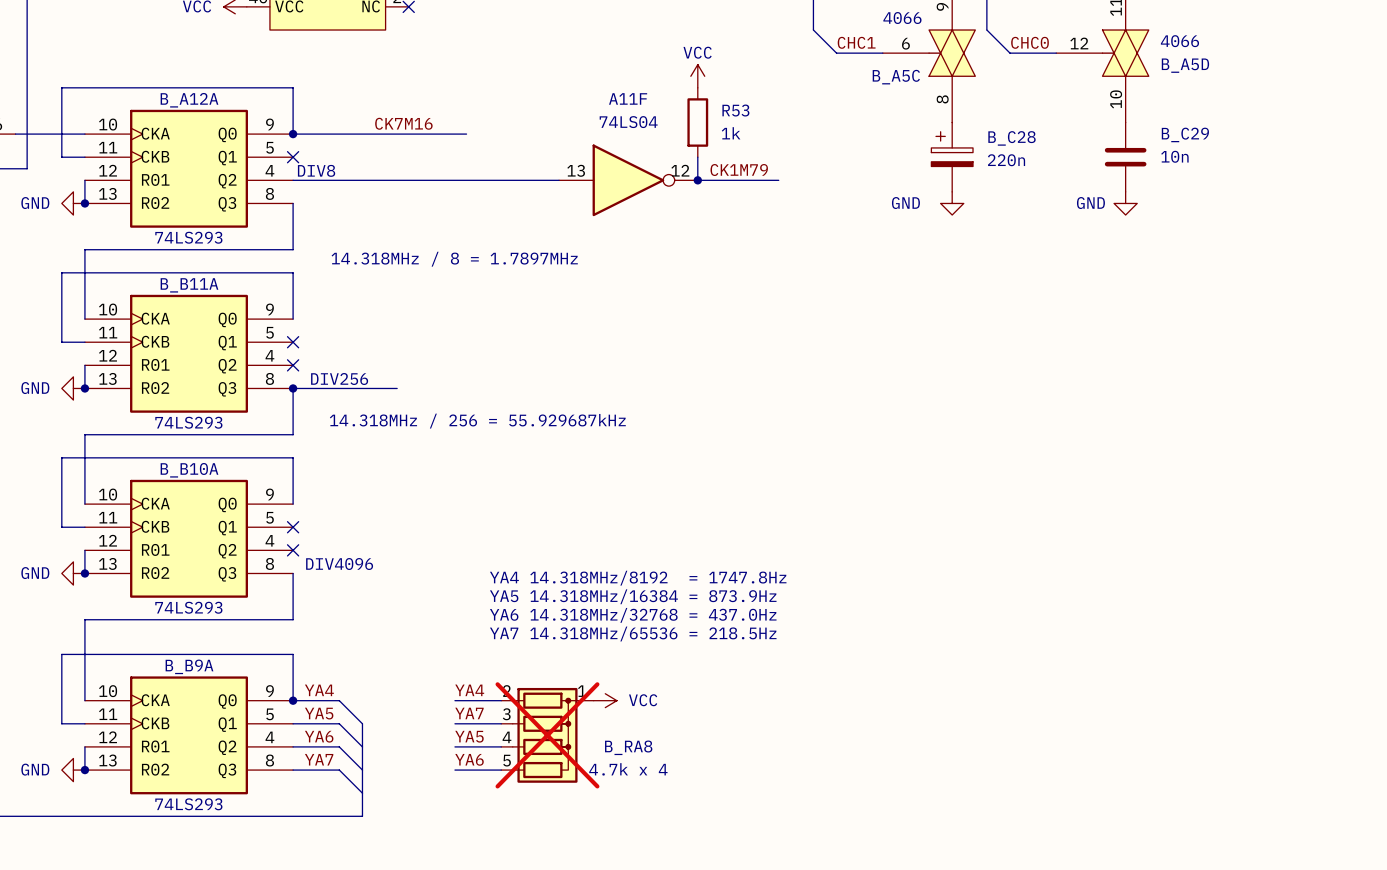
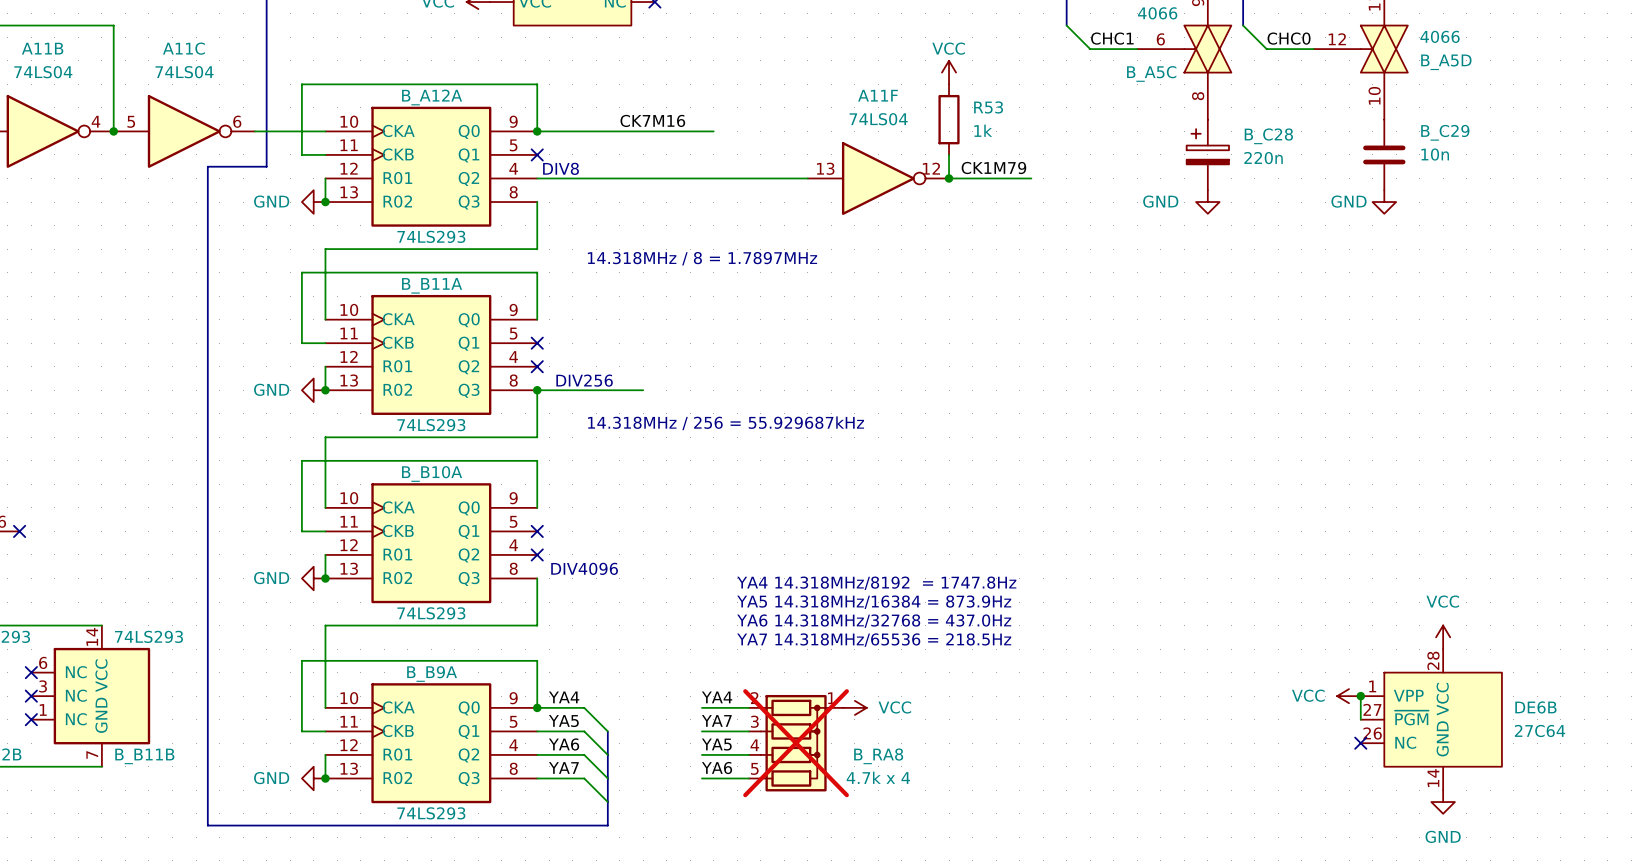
power symbol: none -> VCC (1443, 637)
power symbol: none -> VCC (1349, 696)
wire: none -> (1360, 696) (1360, 719)
junction: none -> (1360, 696)
DE6B: none -> 27C64 (1431, 719)
no-connect mark: none -> (1360, 743)
power symbol: none -> GND (1443, 802)

